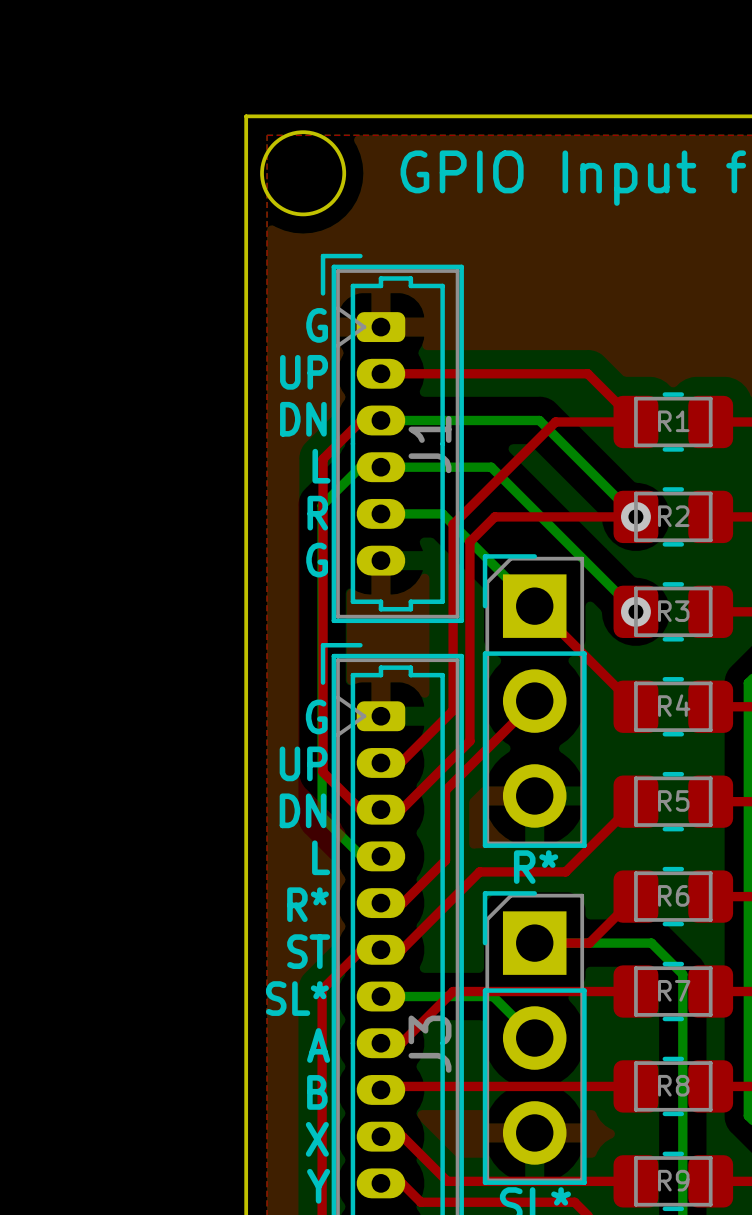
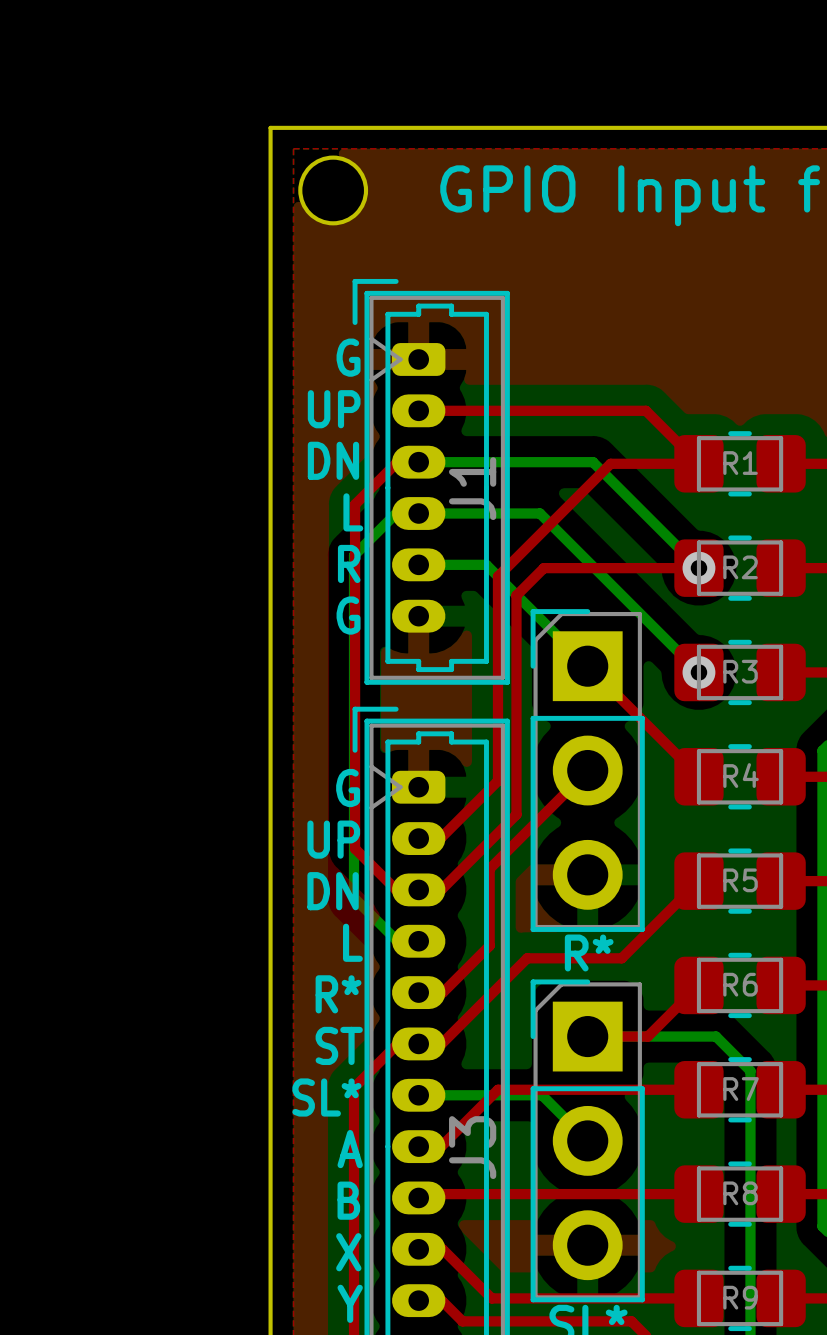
round board edge size: [260, 130, 347, 217] -> [298, 155, 369, 226]

